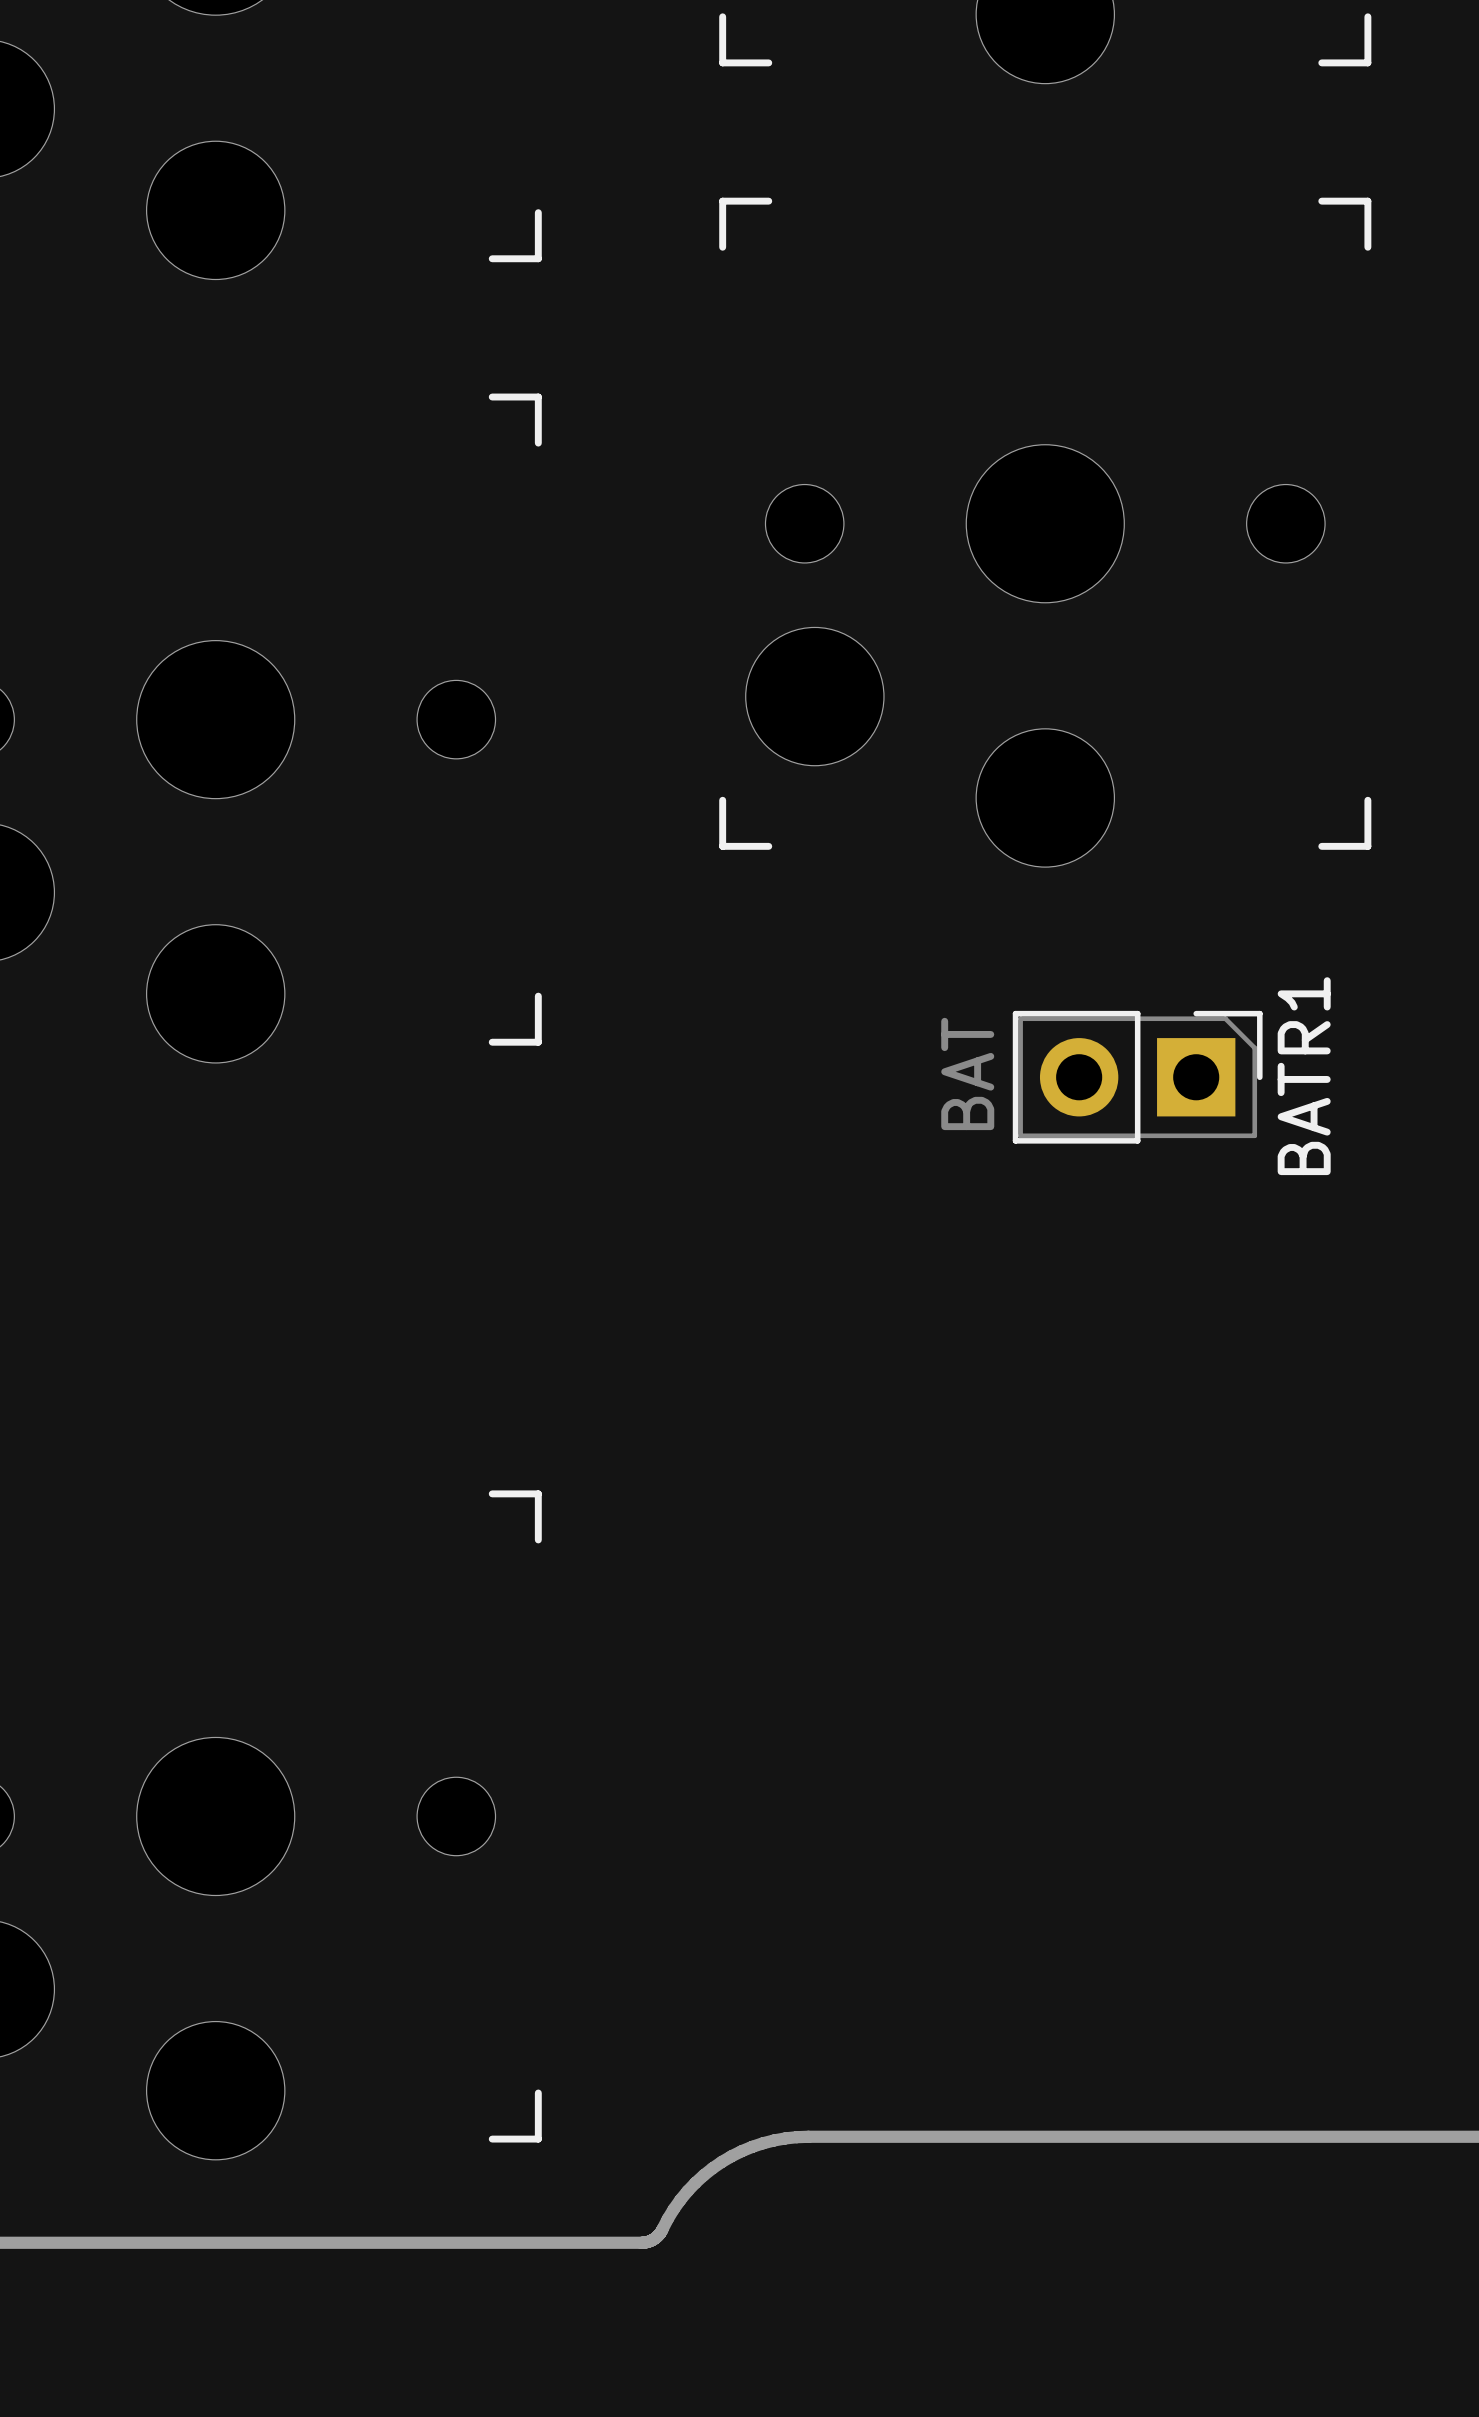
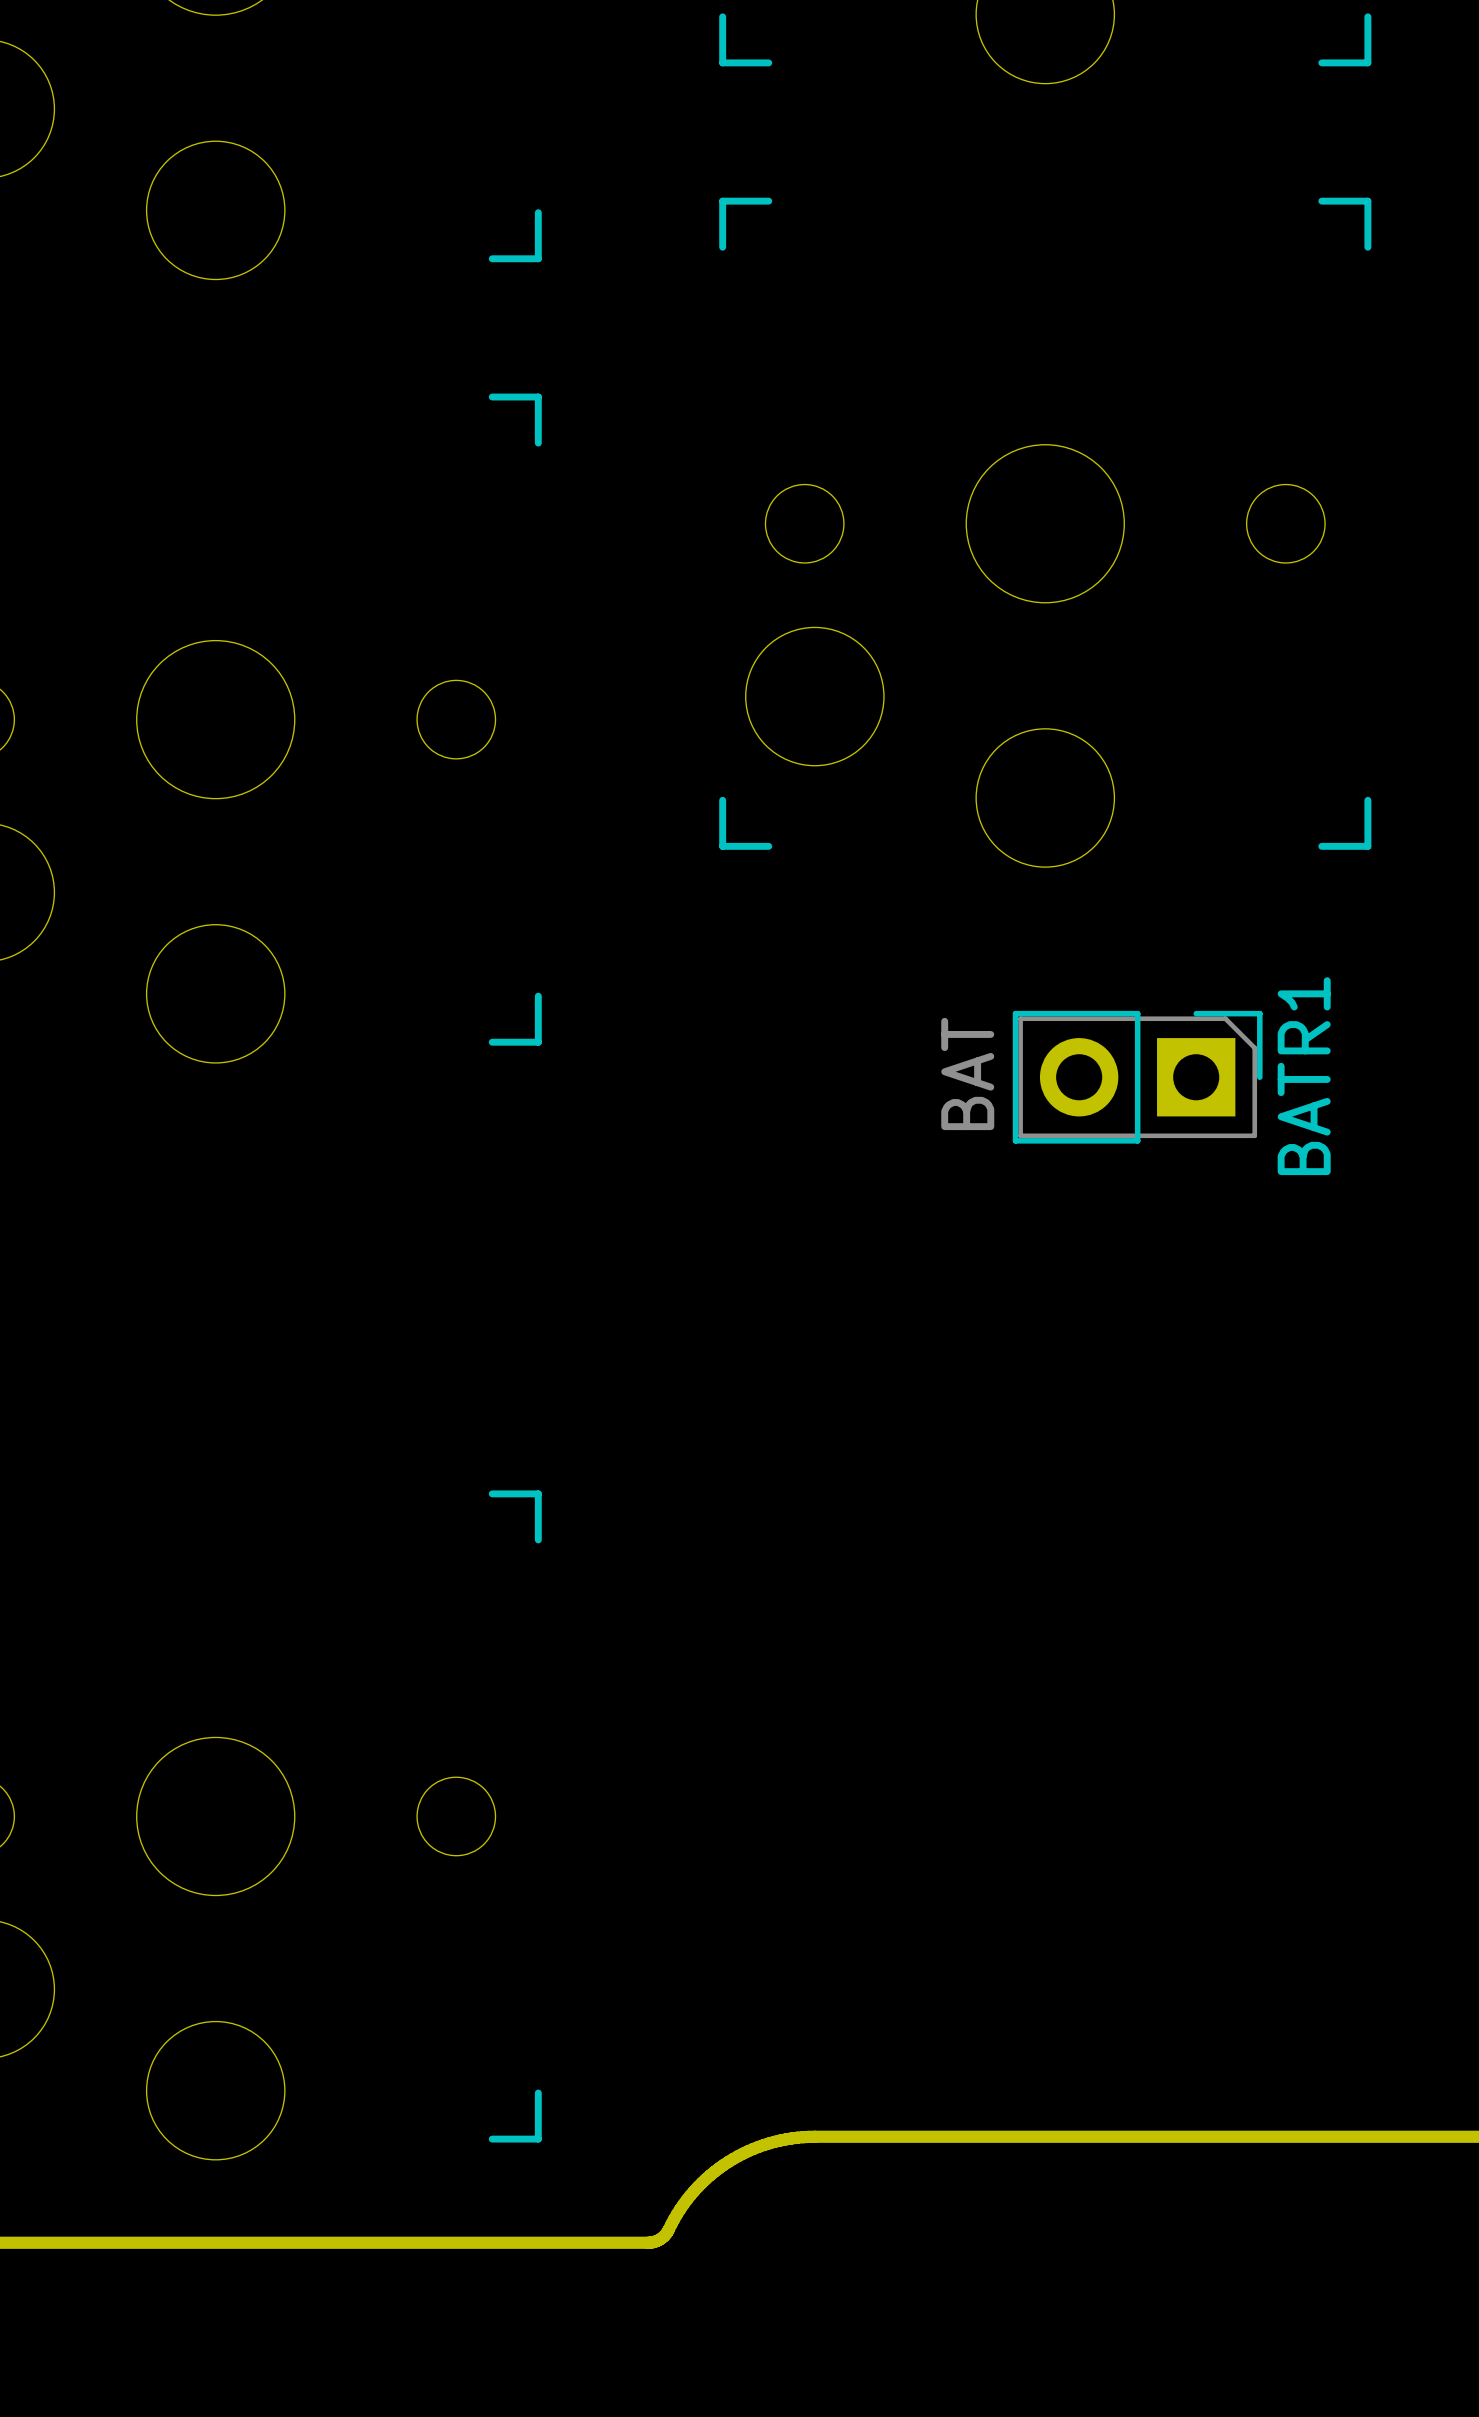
board edge: (814, 2136) (785, 2138) (762, 2143) (741, 2151) (721, 2161) (703, 2175) (687, 2191) (673, 2209) (662, 2229) -> (814, 2136) (791, 2138) (769, 2143) (748, 2151) (728, 2161) (710, 2175) (694, 2191) (680, 2209) (664, 2236) (654, 2241) (641, 2242)

